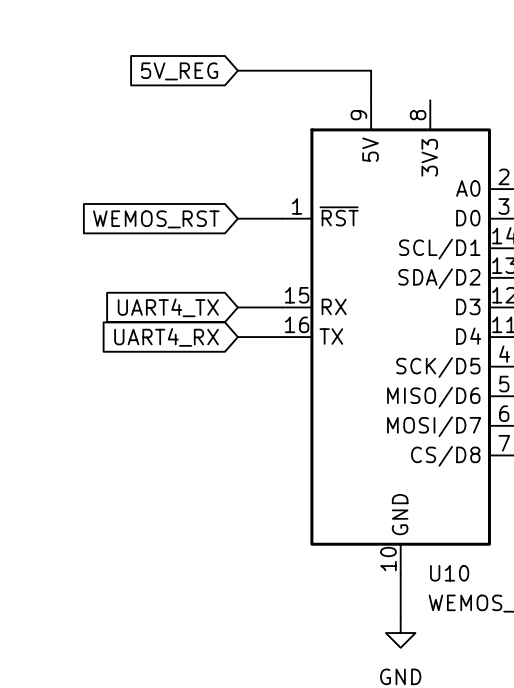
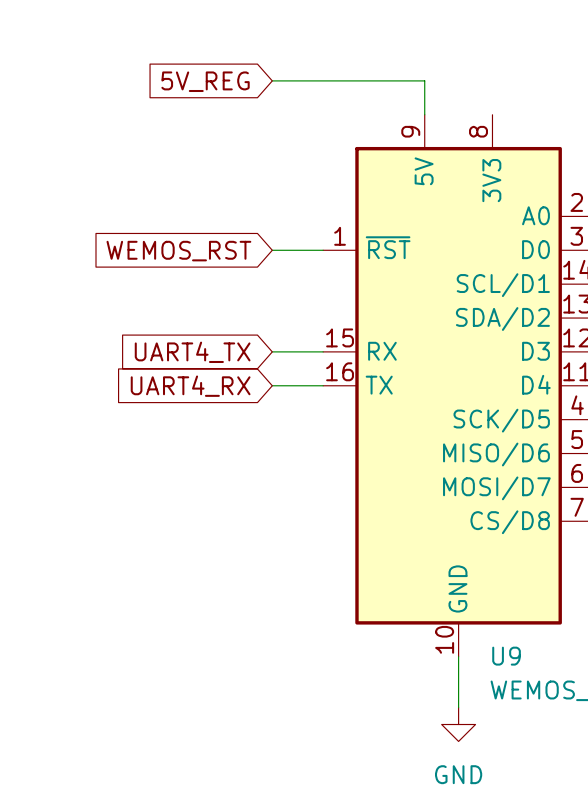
U10 name: U10 (449, 573) -> U9 (506, 656)

